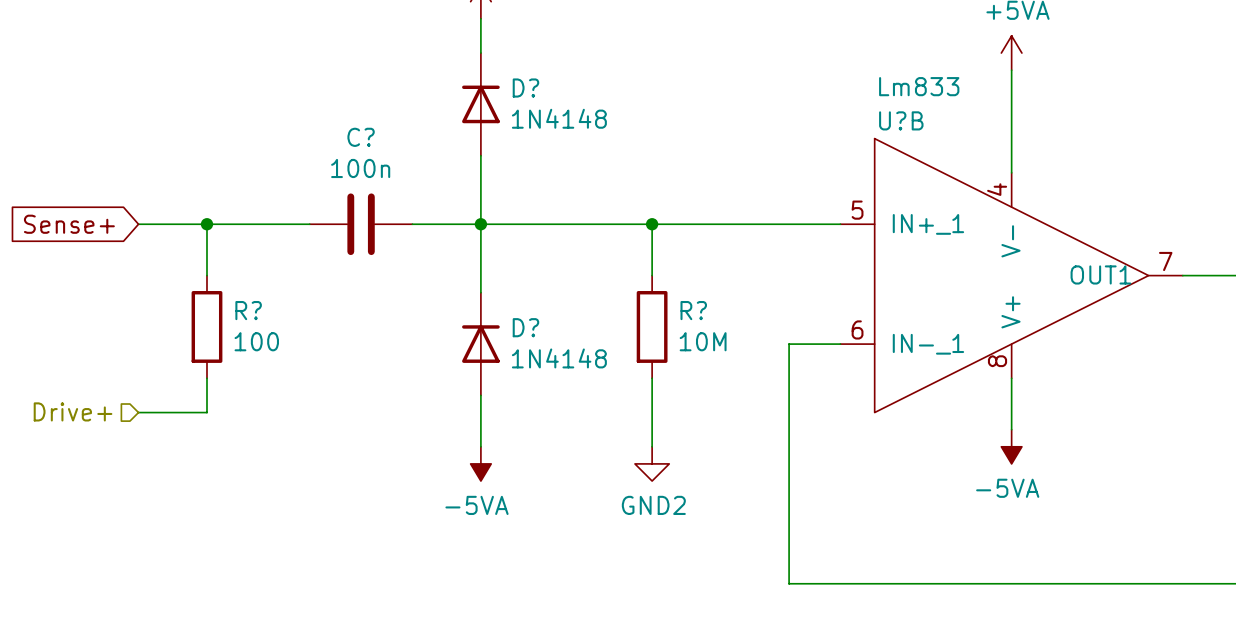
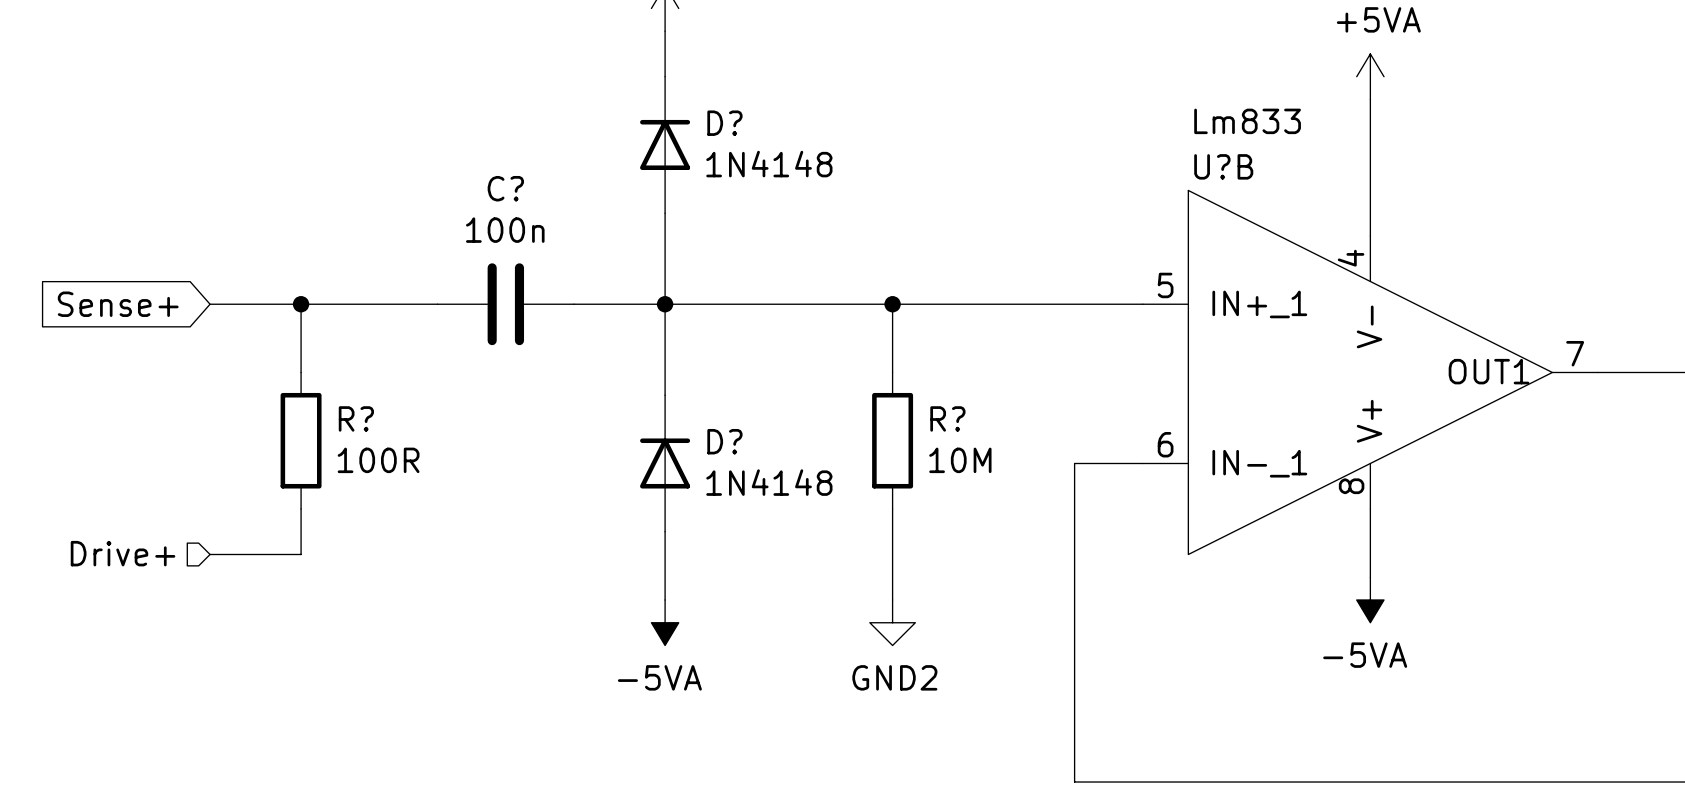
R? value: 100 (256, 341) -> 100R (378, 460)

